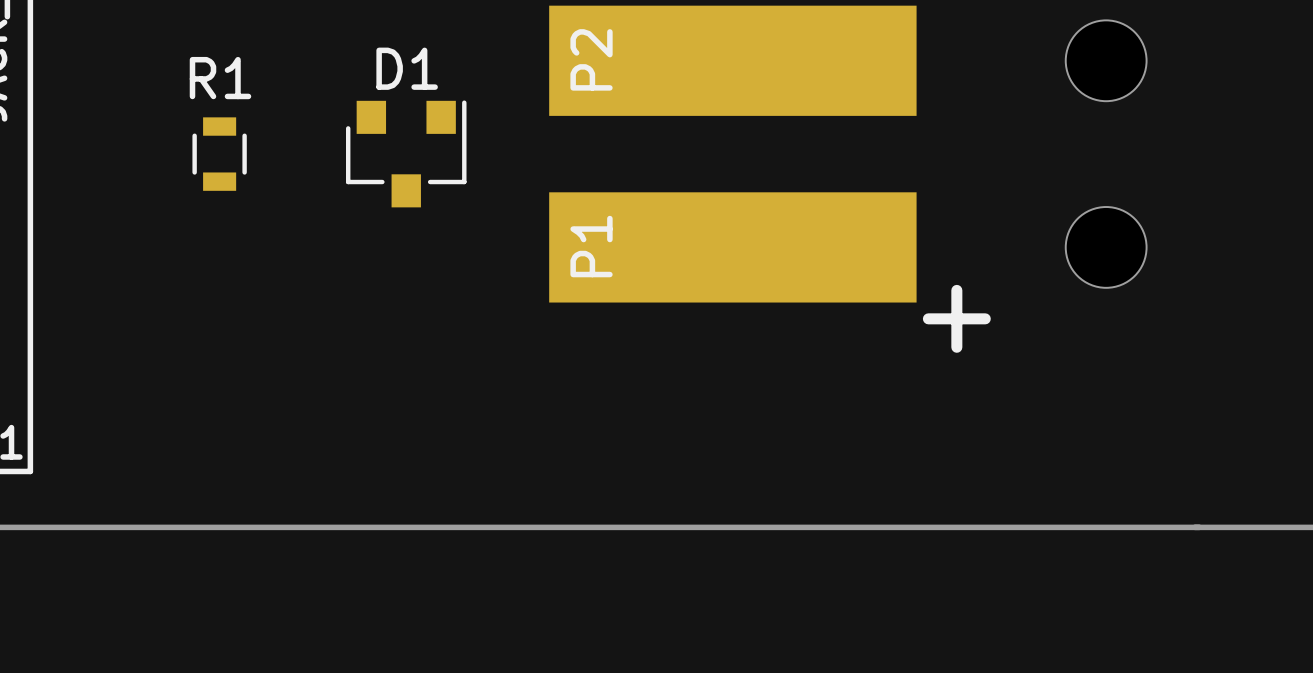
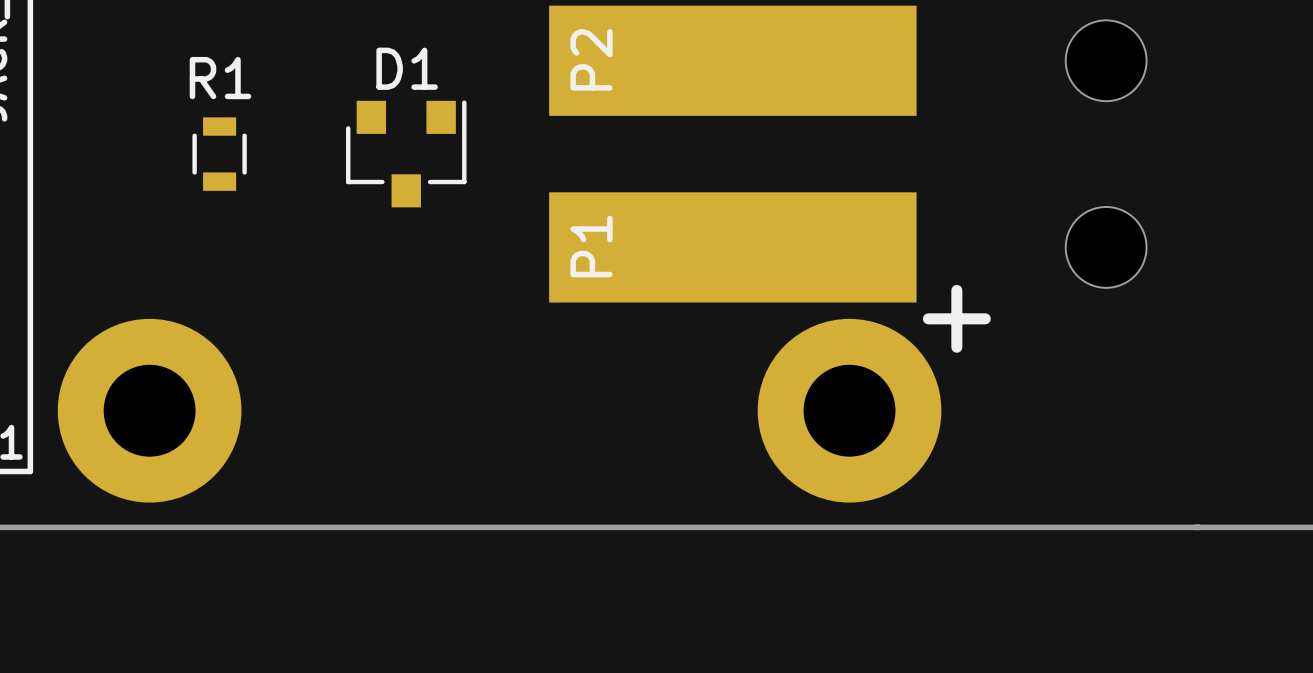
part: none -> (149, 410)
part: none -> (849, 410)

